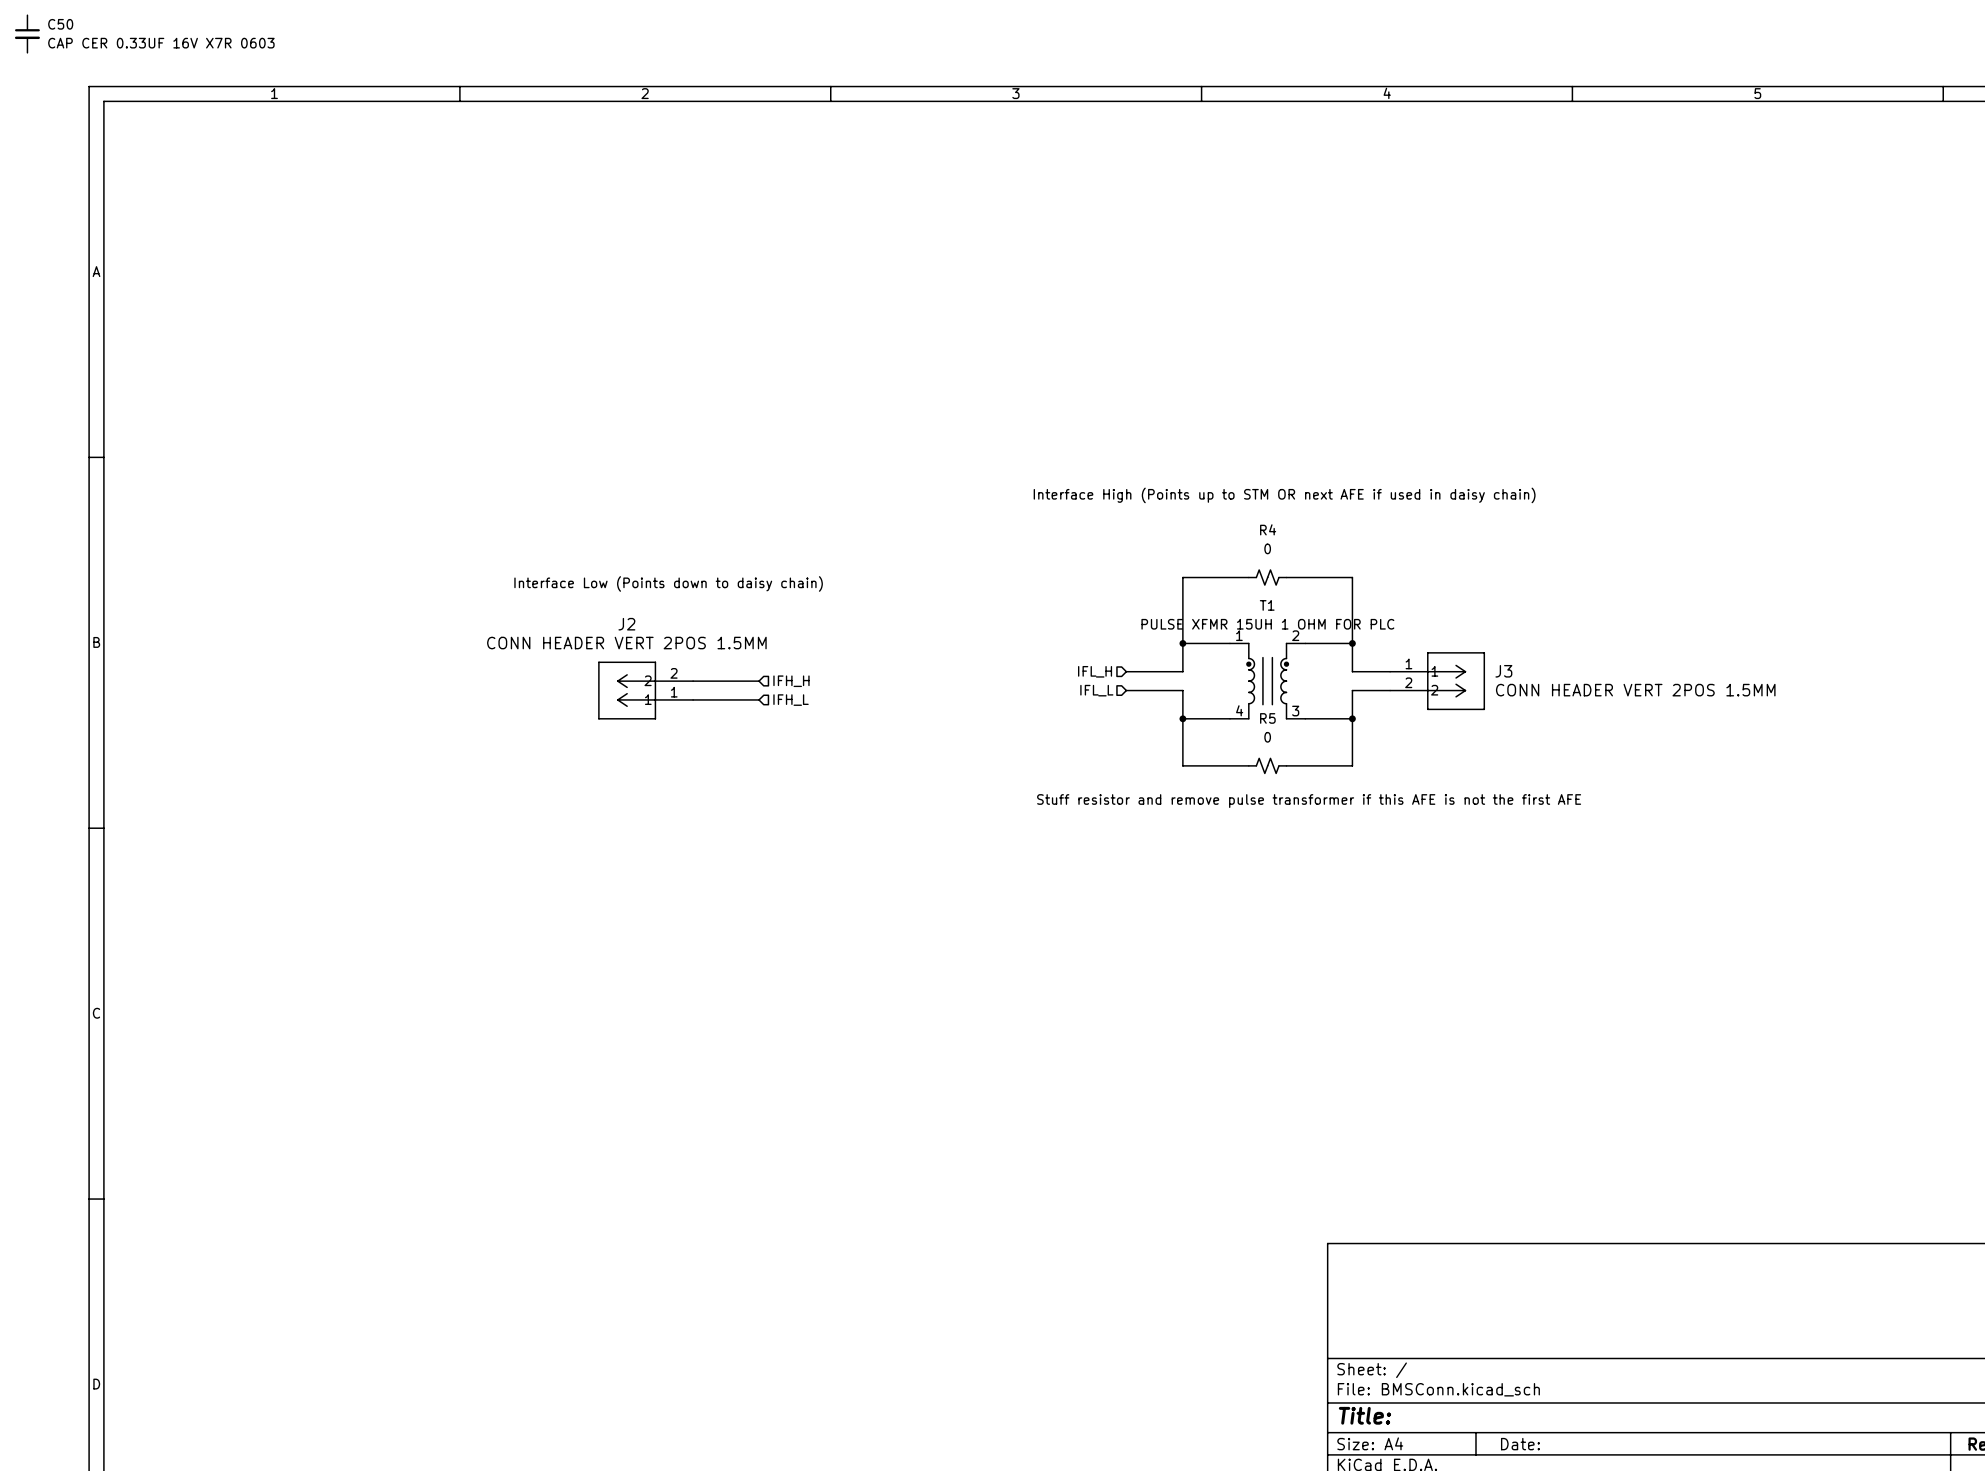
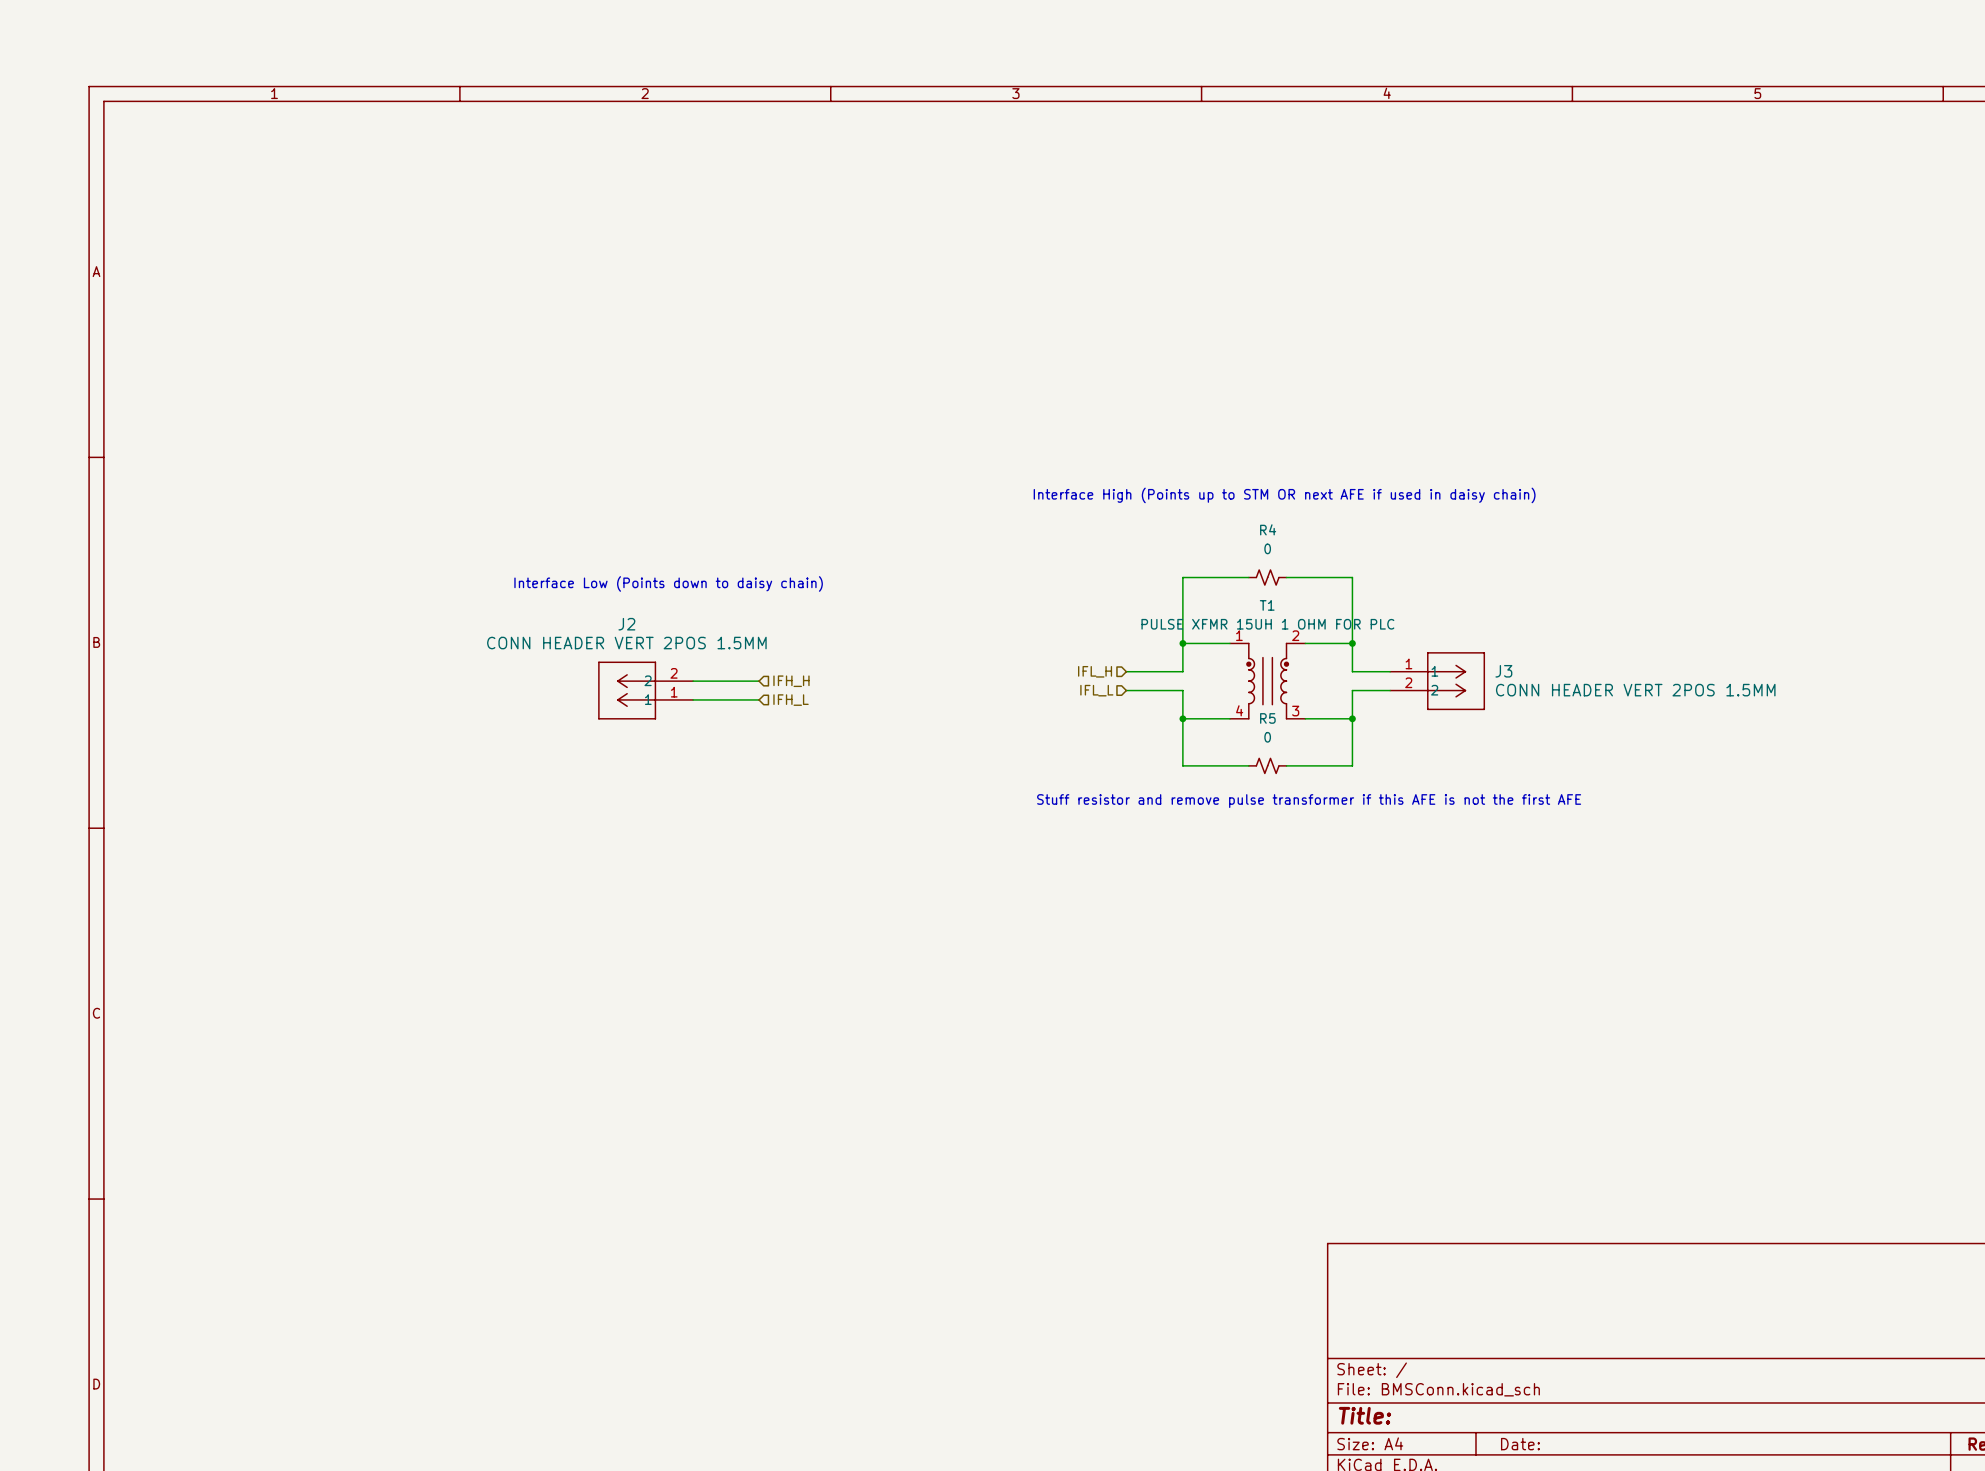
C50: CAP CER 0.33UF 16V X7R 0603 (27, 34) -> none

